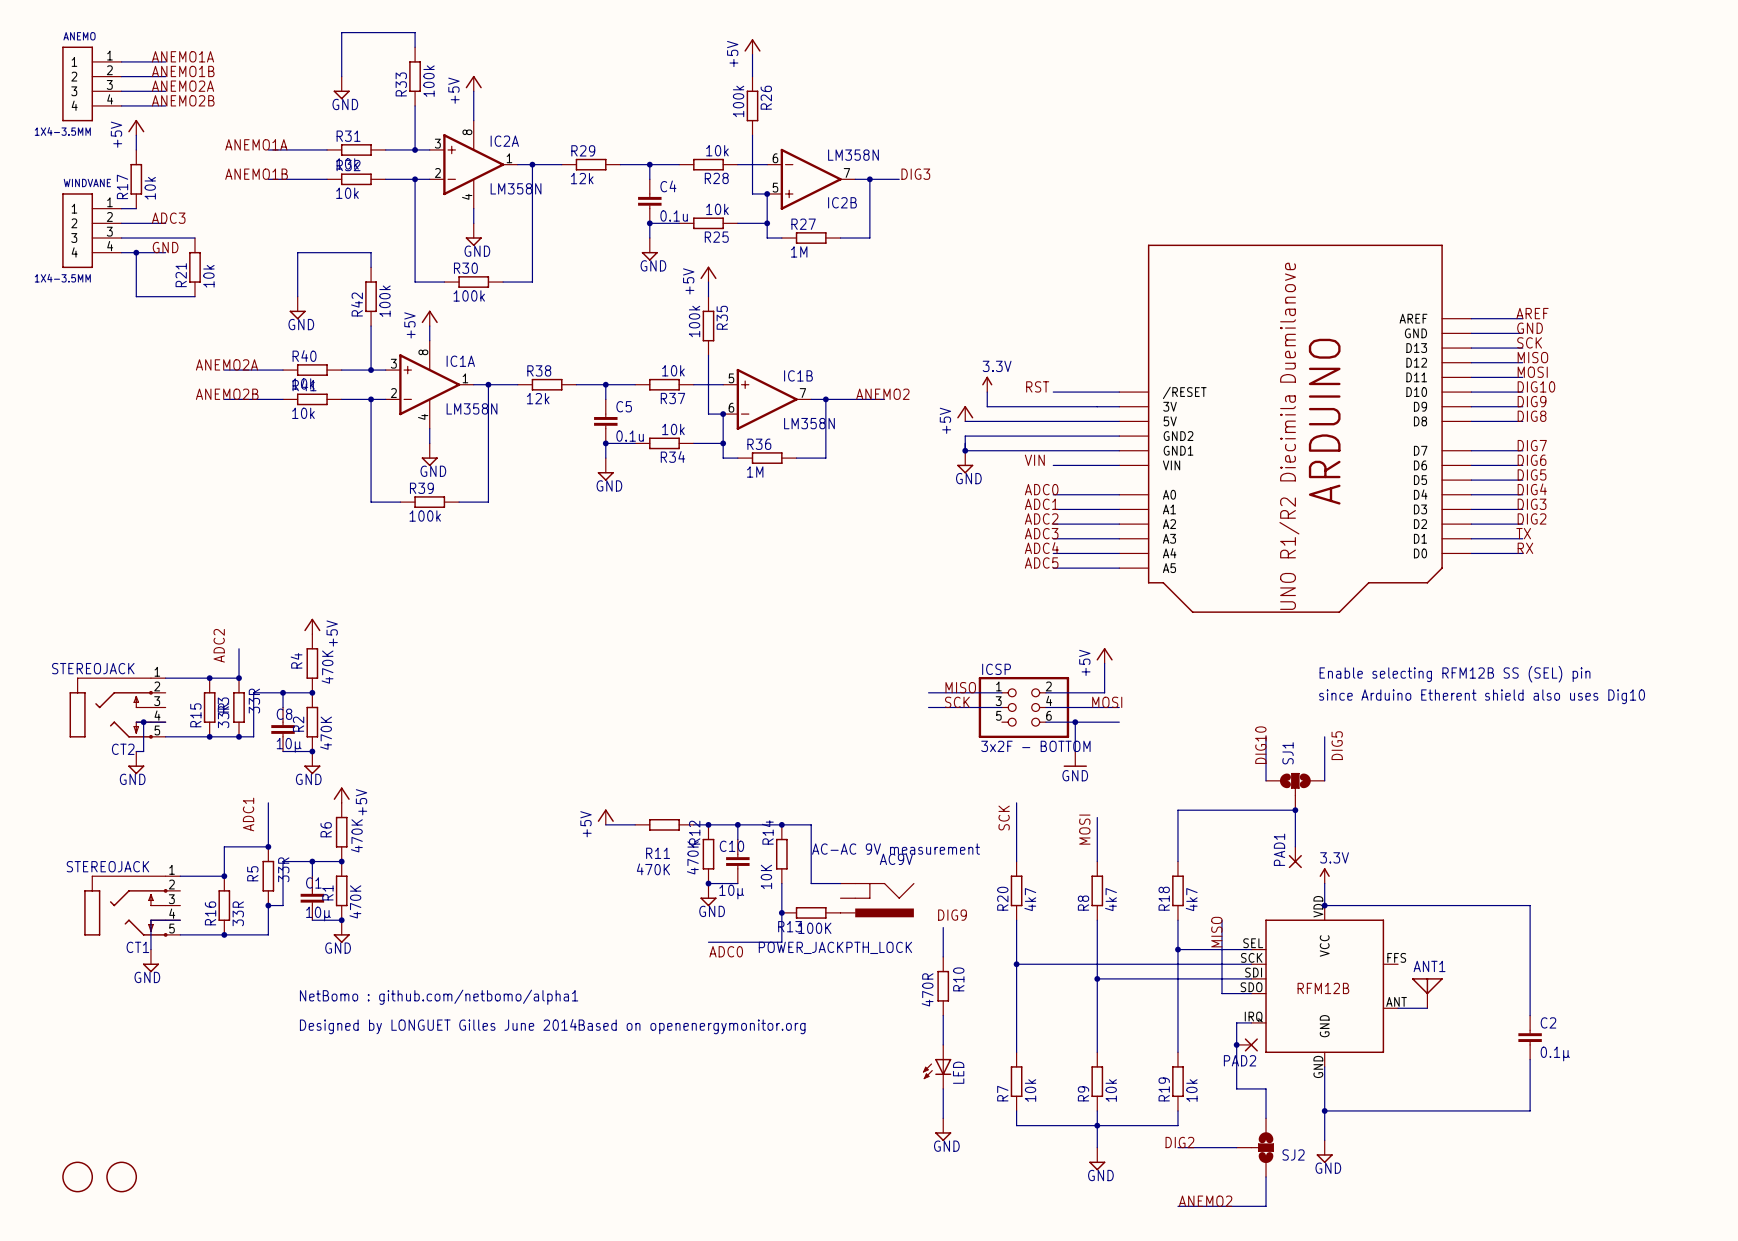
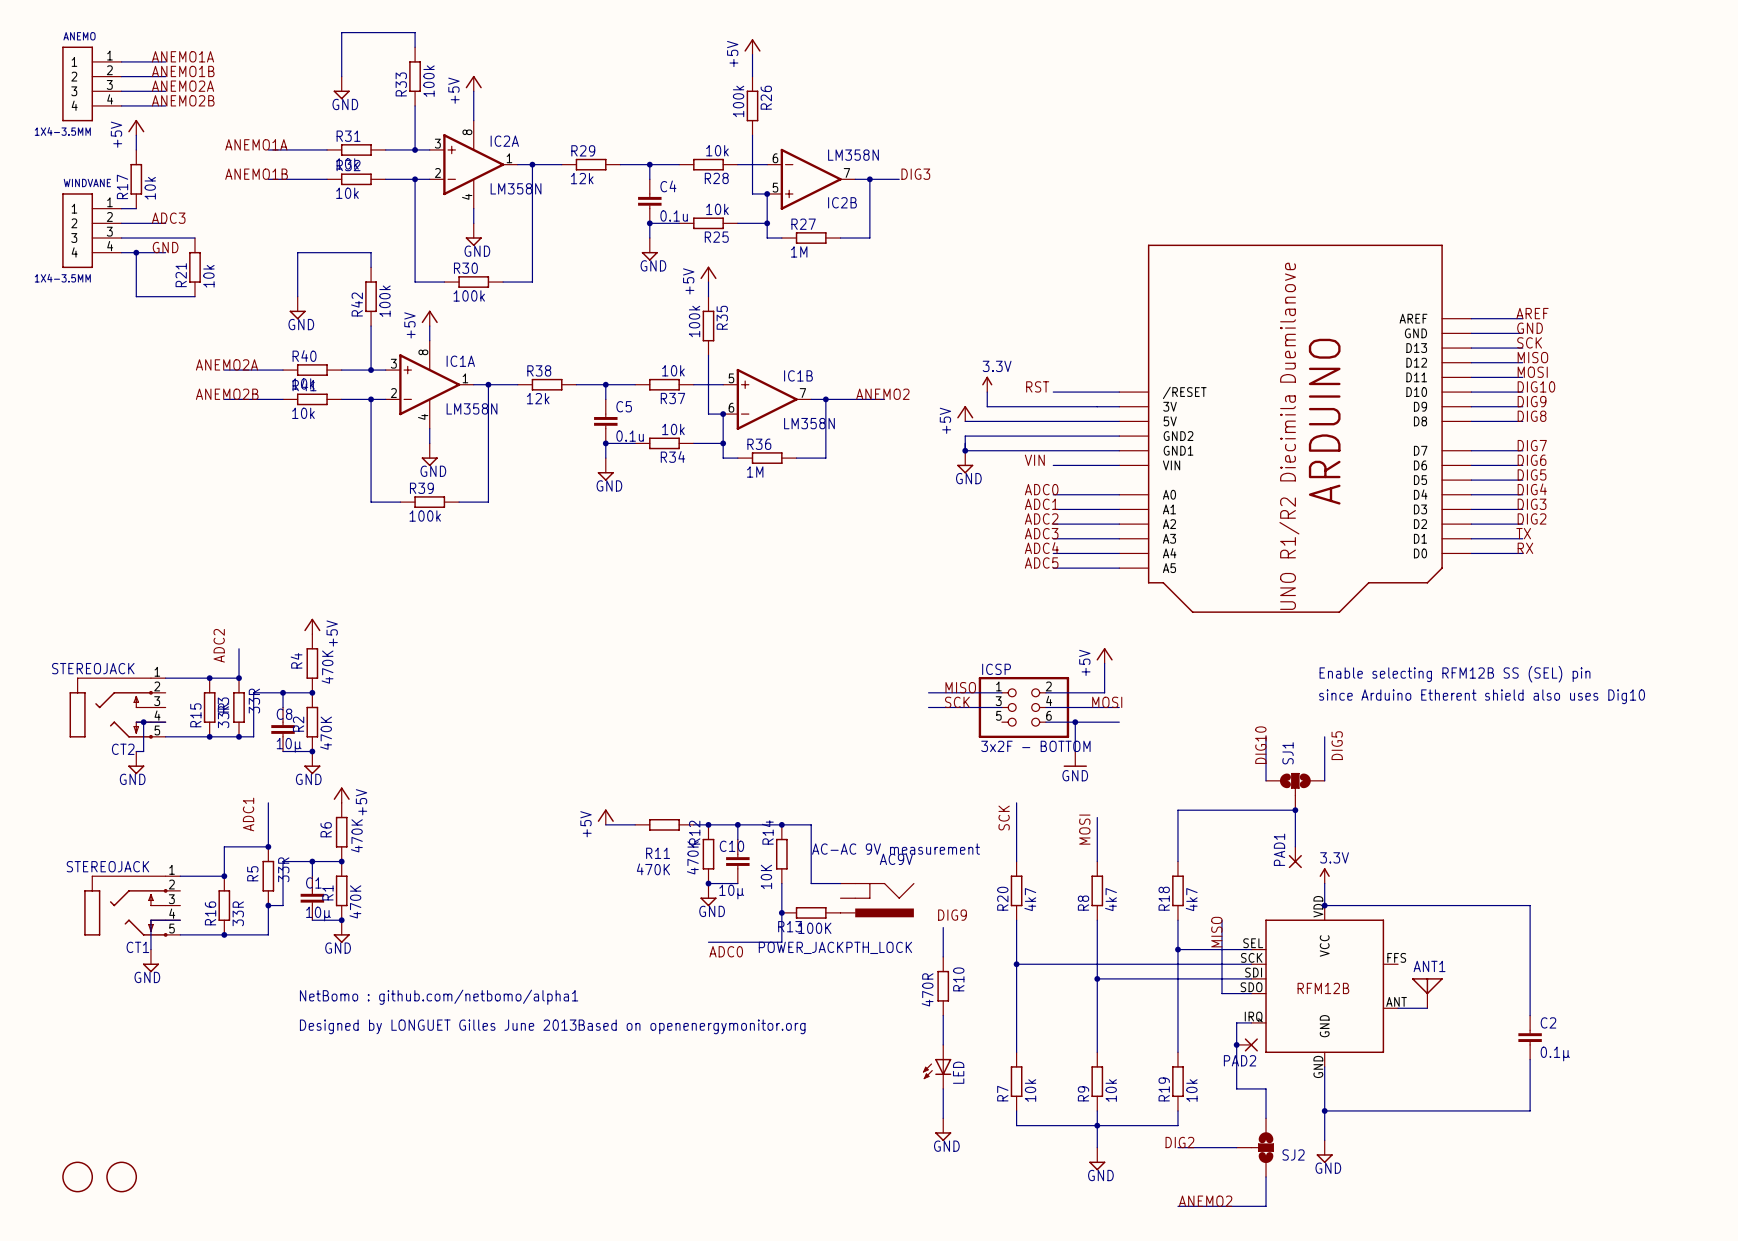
text: Designed by LONGUET Gilles June 2014 (438, 1026) -> Designed by LONGUET Gilles June 2013 (438, 1026)

